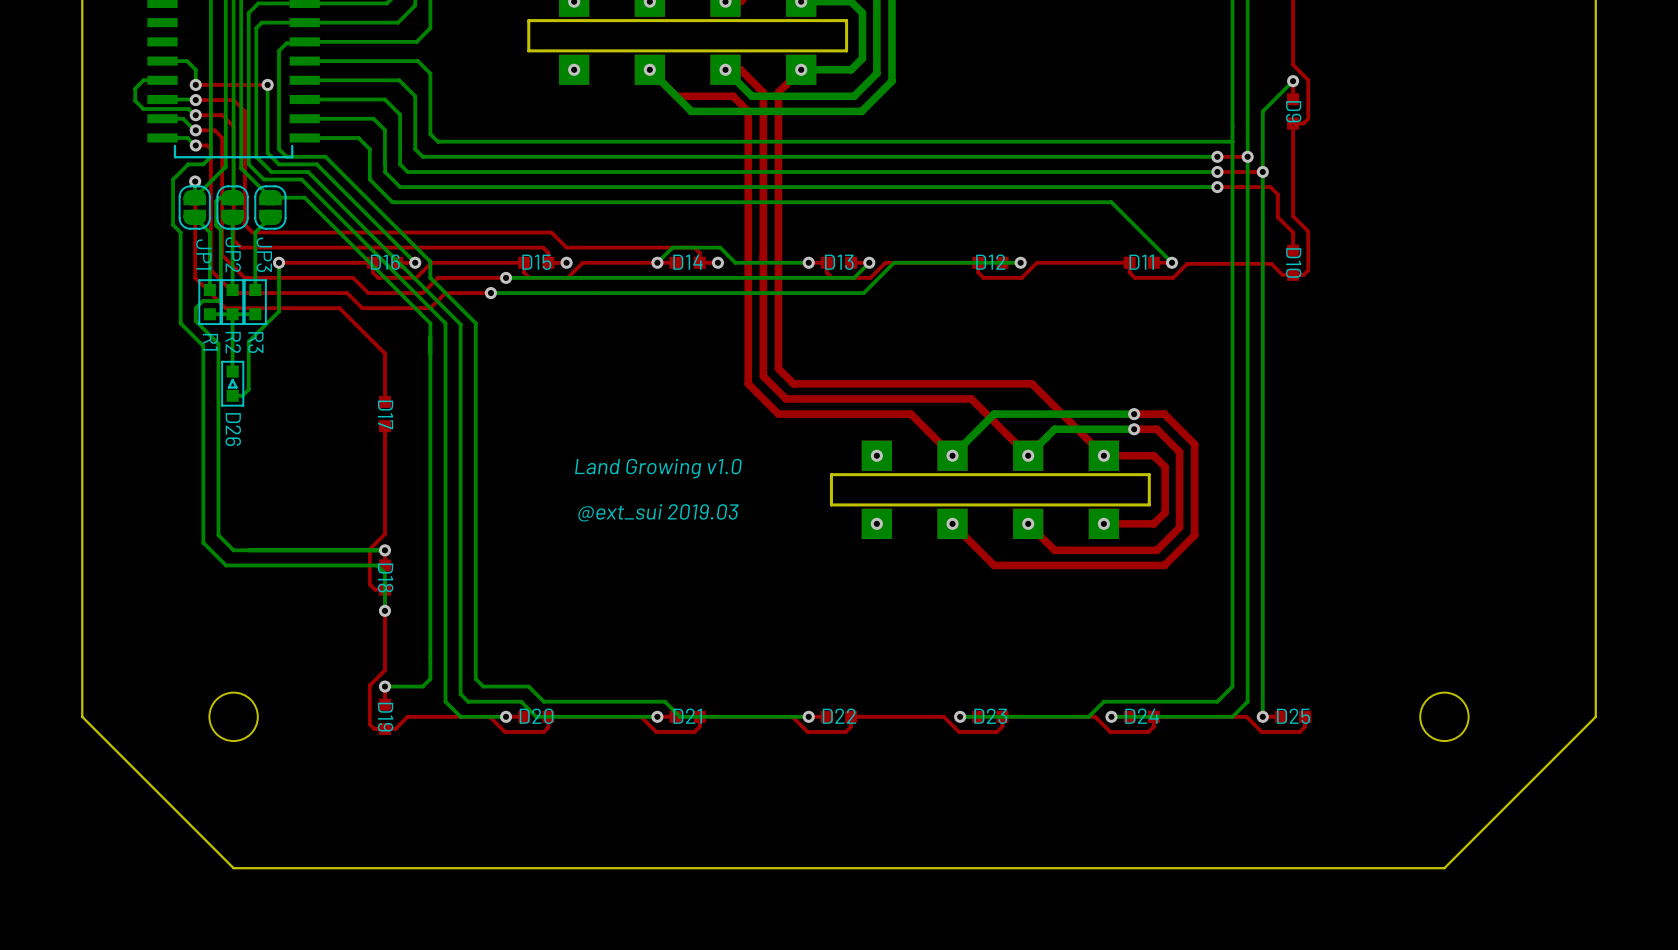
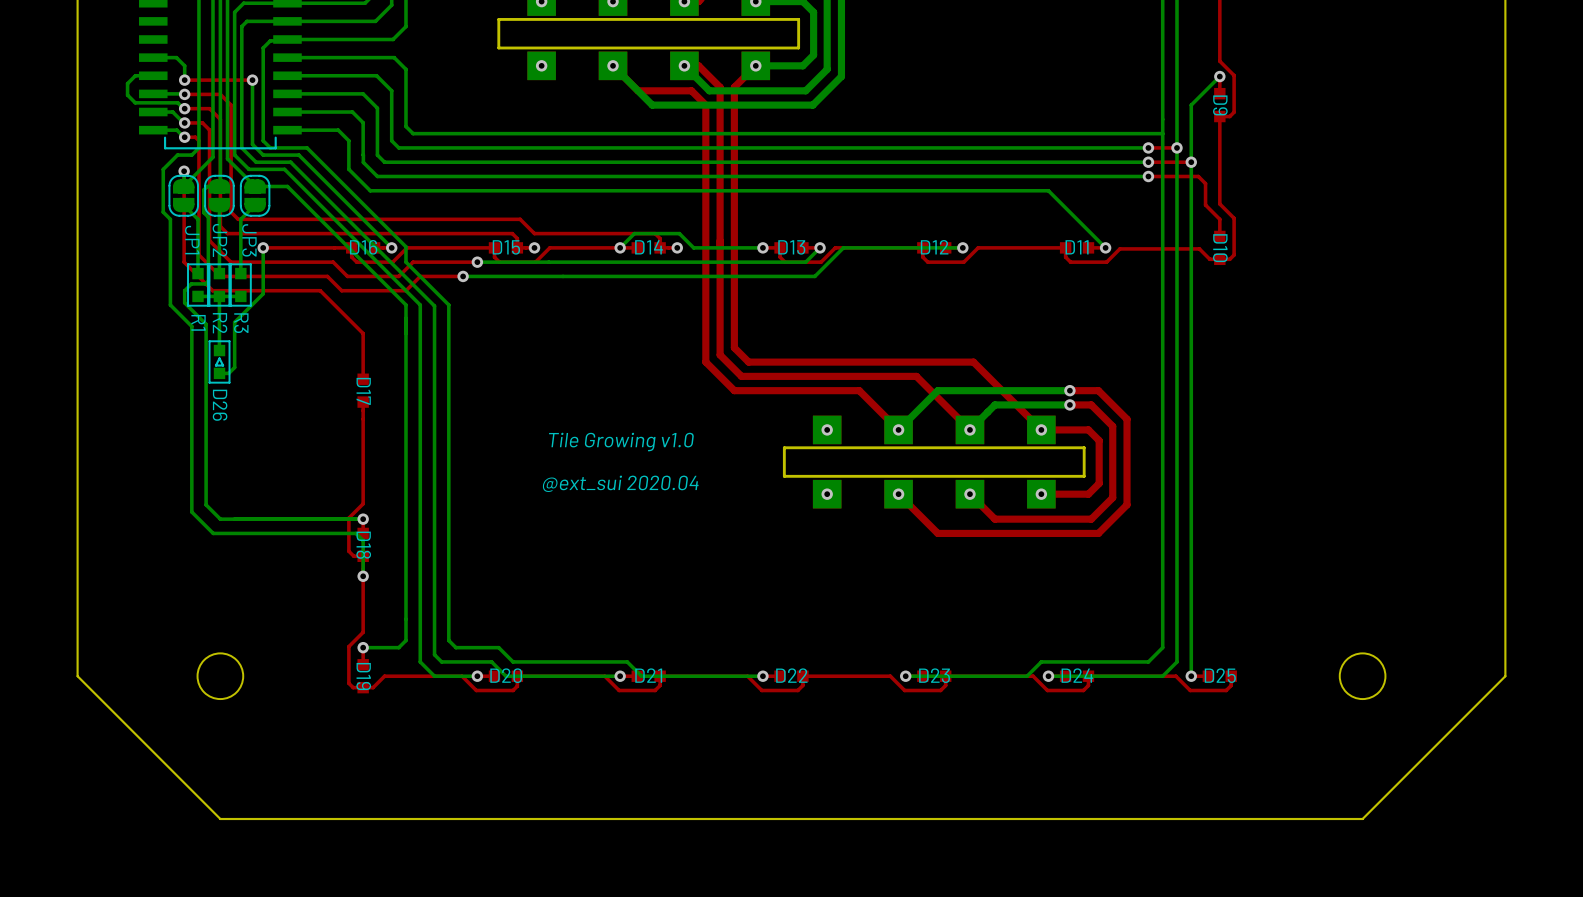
text: Land Growing v1.0 (658, 468) -> Tile Growing v1.0 (621, 442)
text: @ext_sui 2019.03 (658, 512) -> @ext_sui 2020.04 (620, 483)

